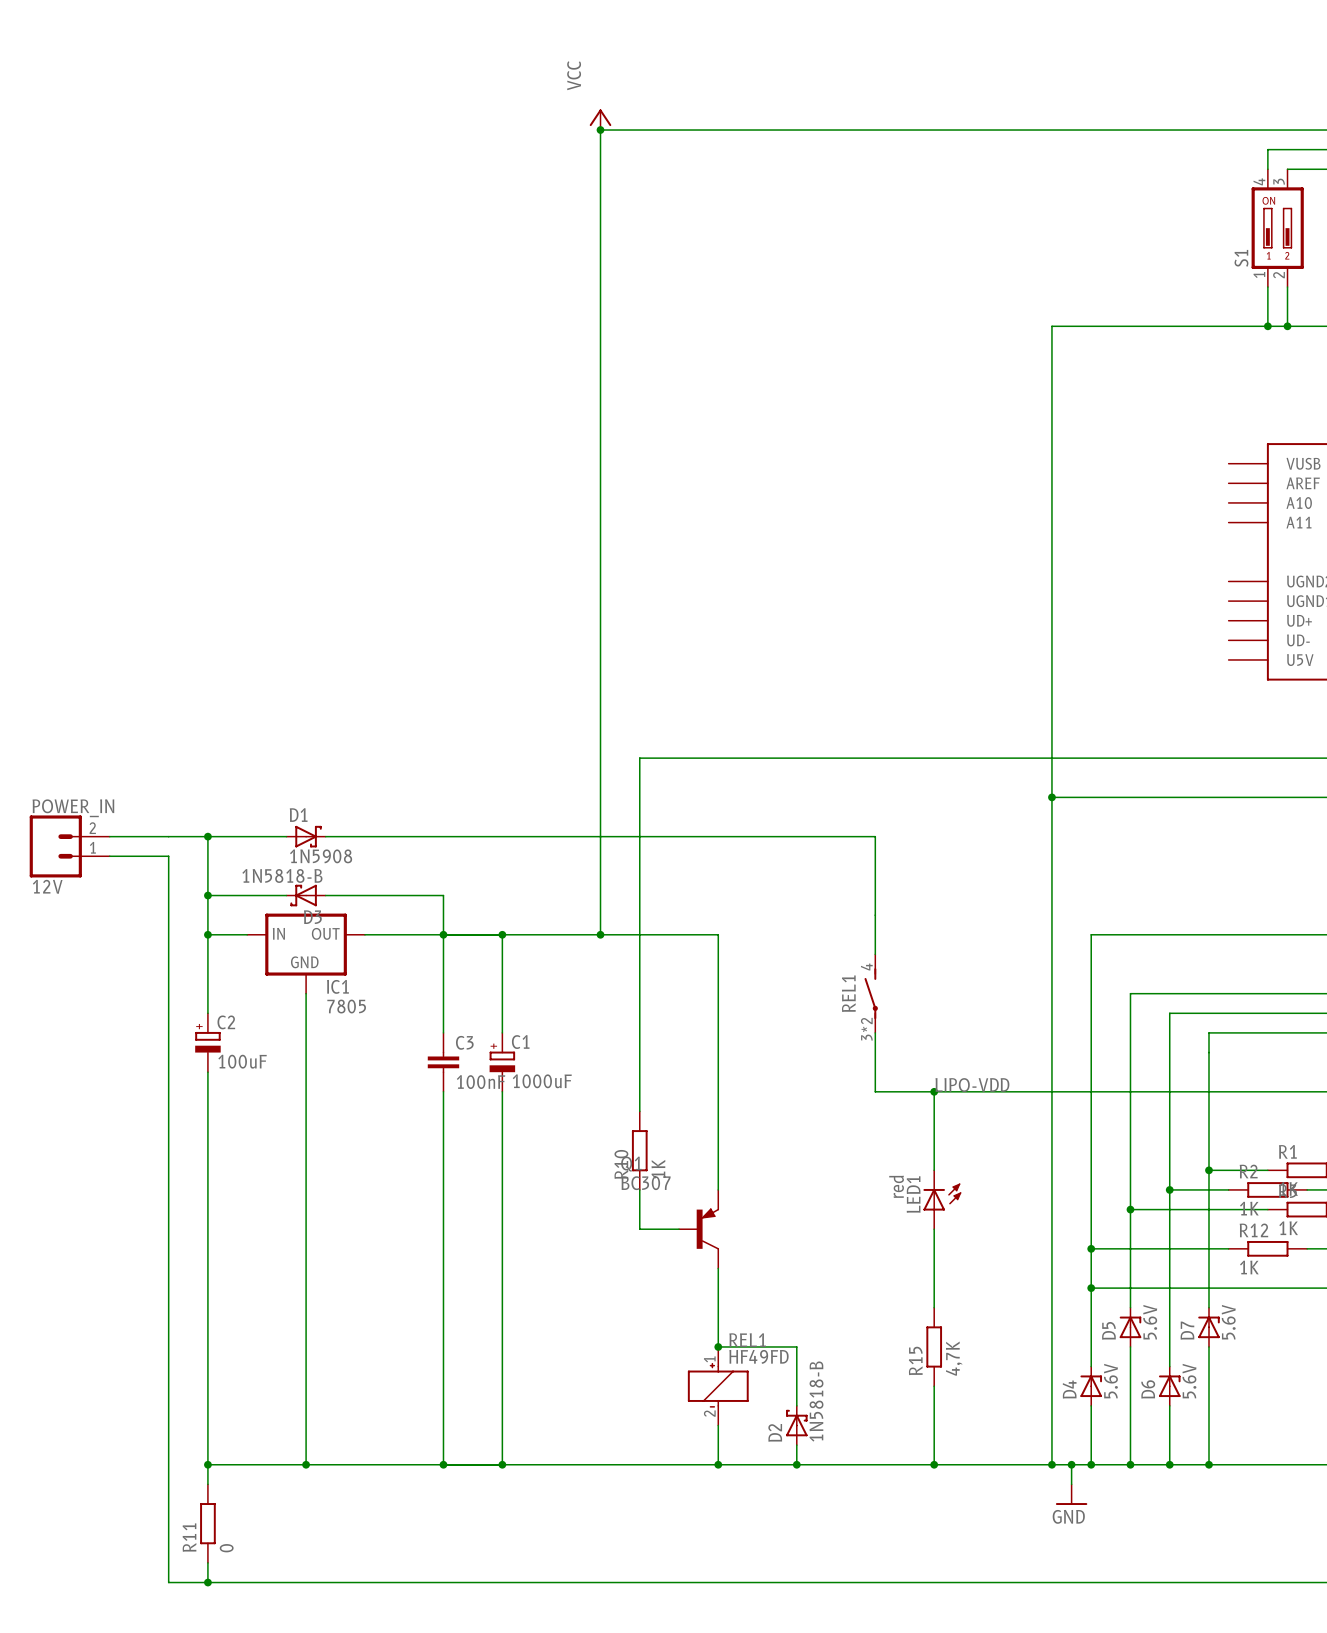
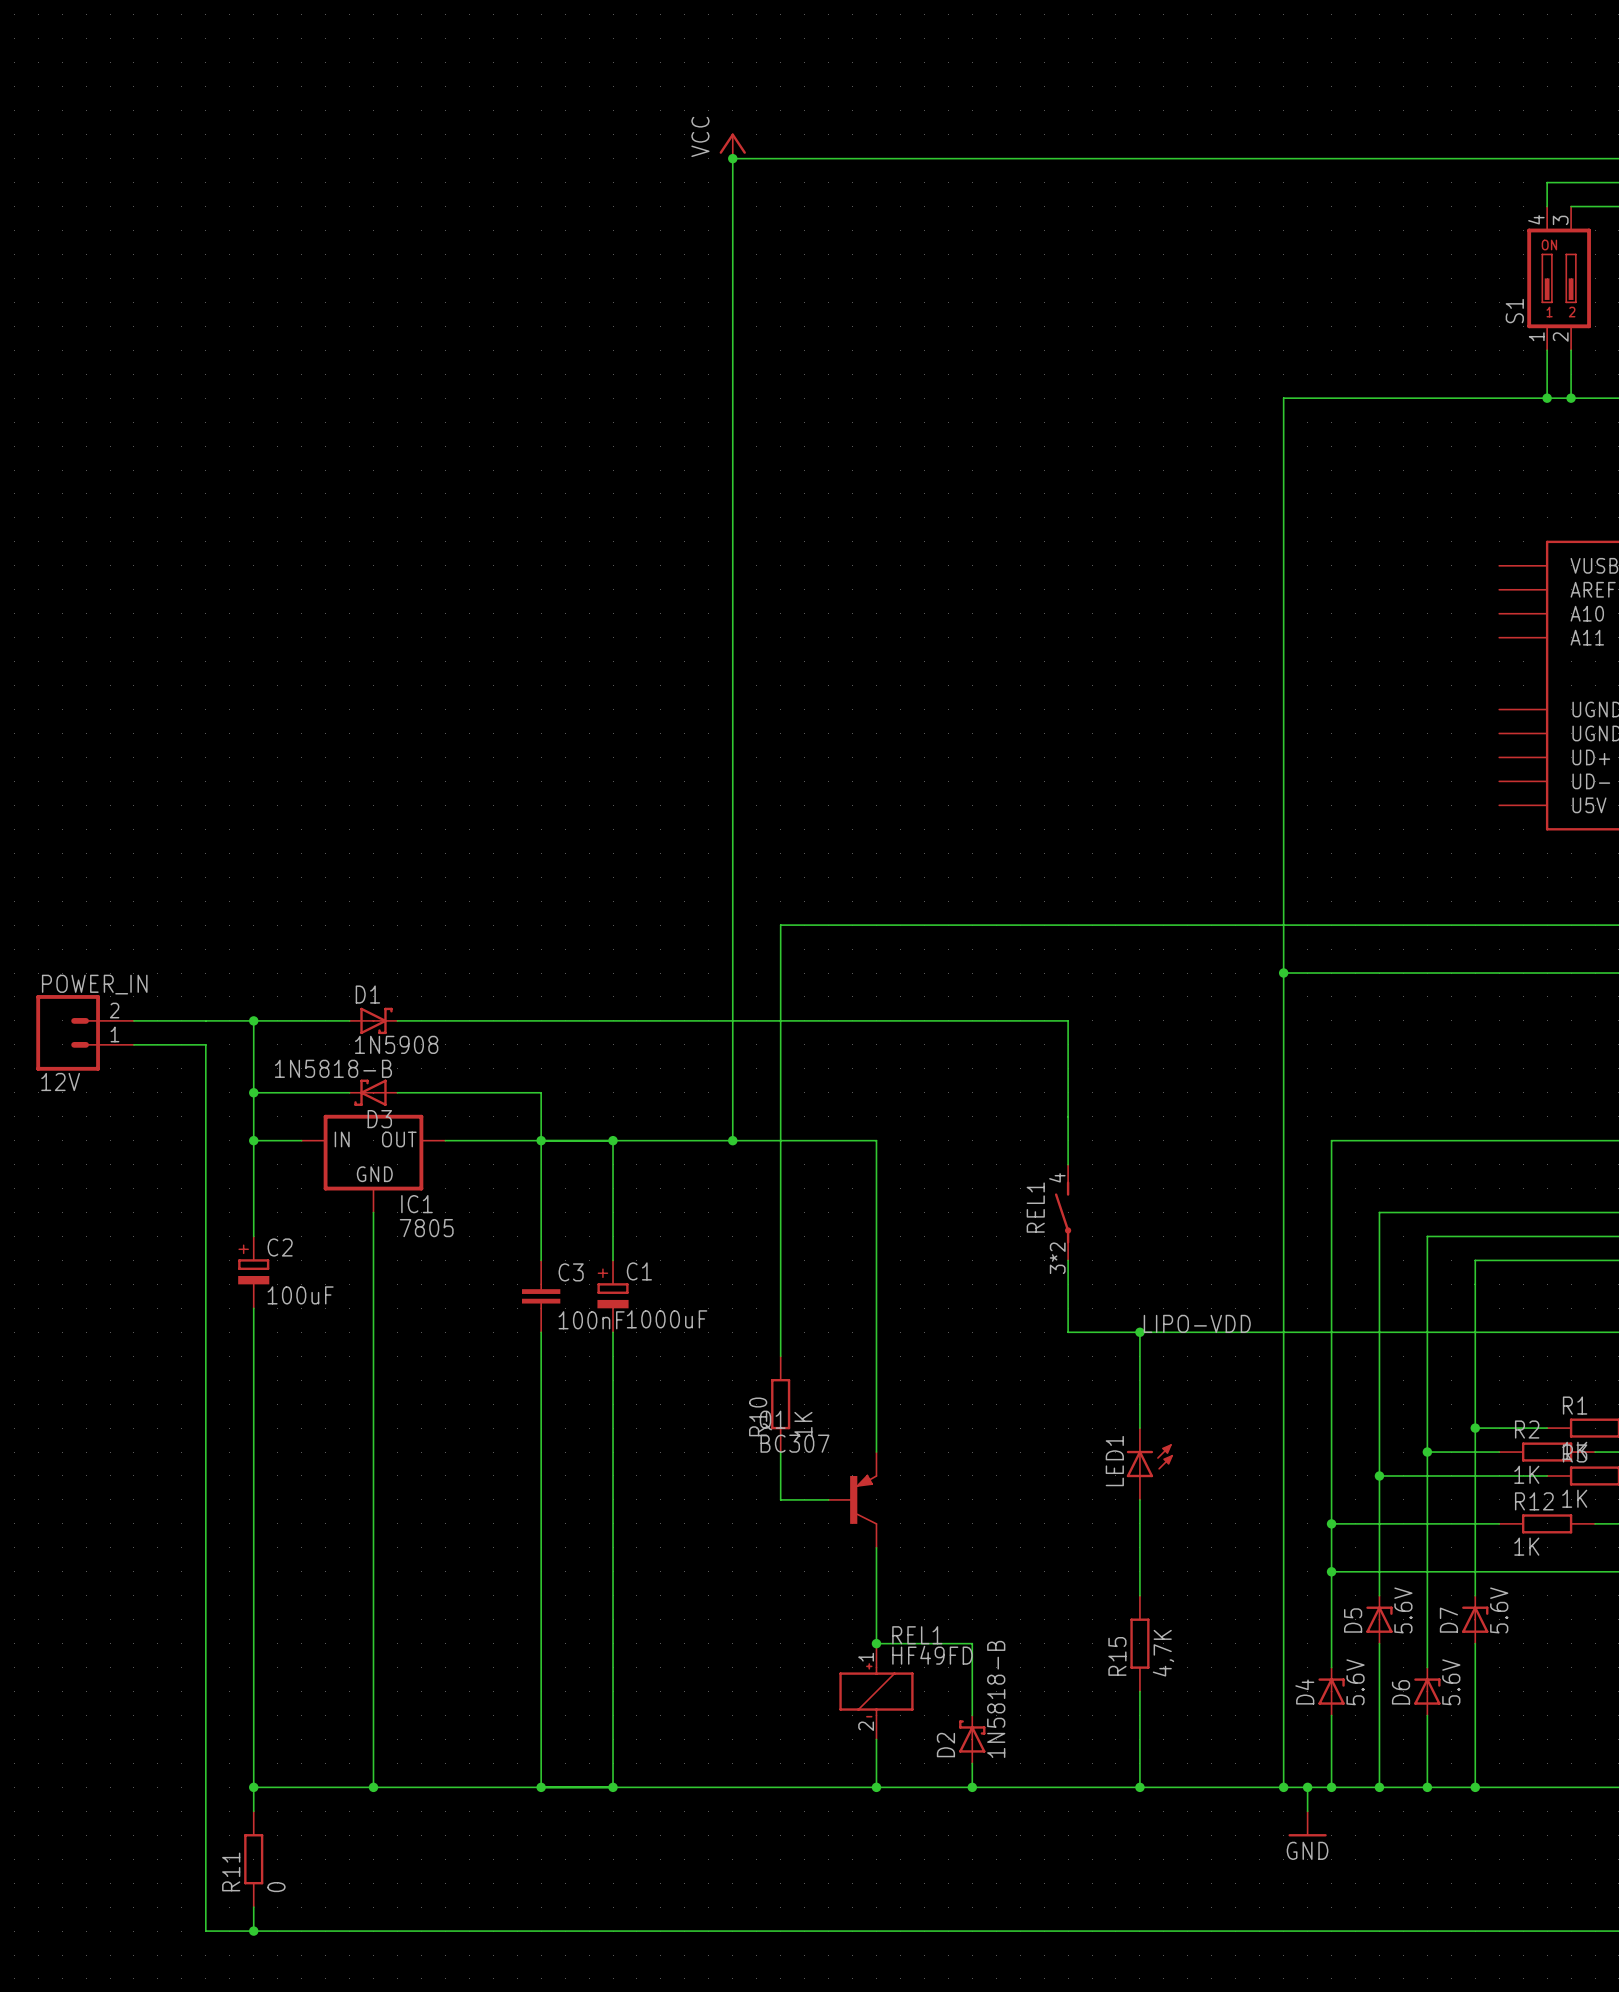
power symbol text position: VCC (574, 75) -> VCC (700, 136)
LED1 value: red (896, 1186) -> none

